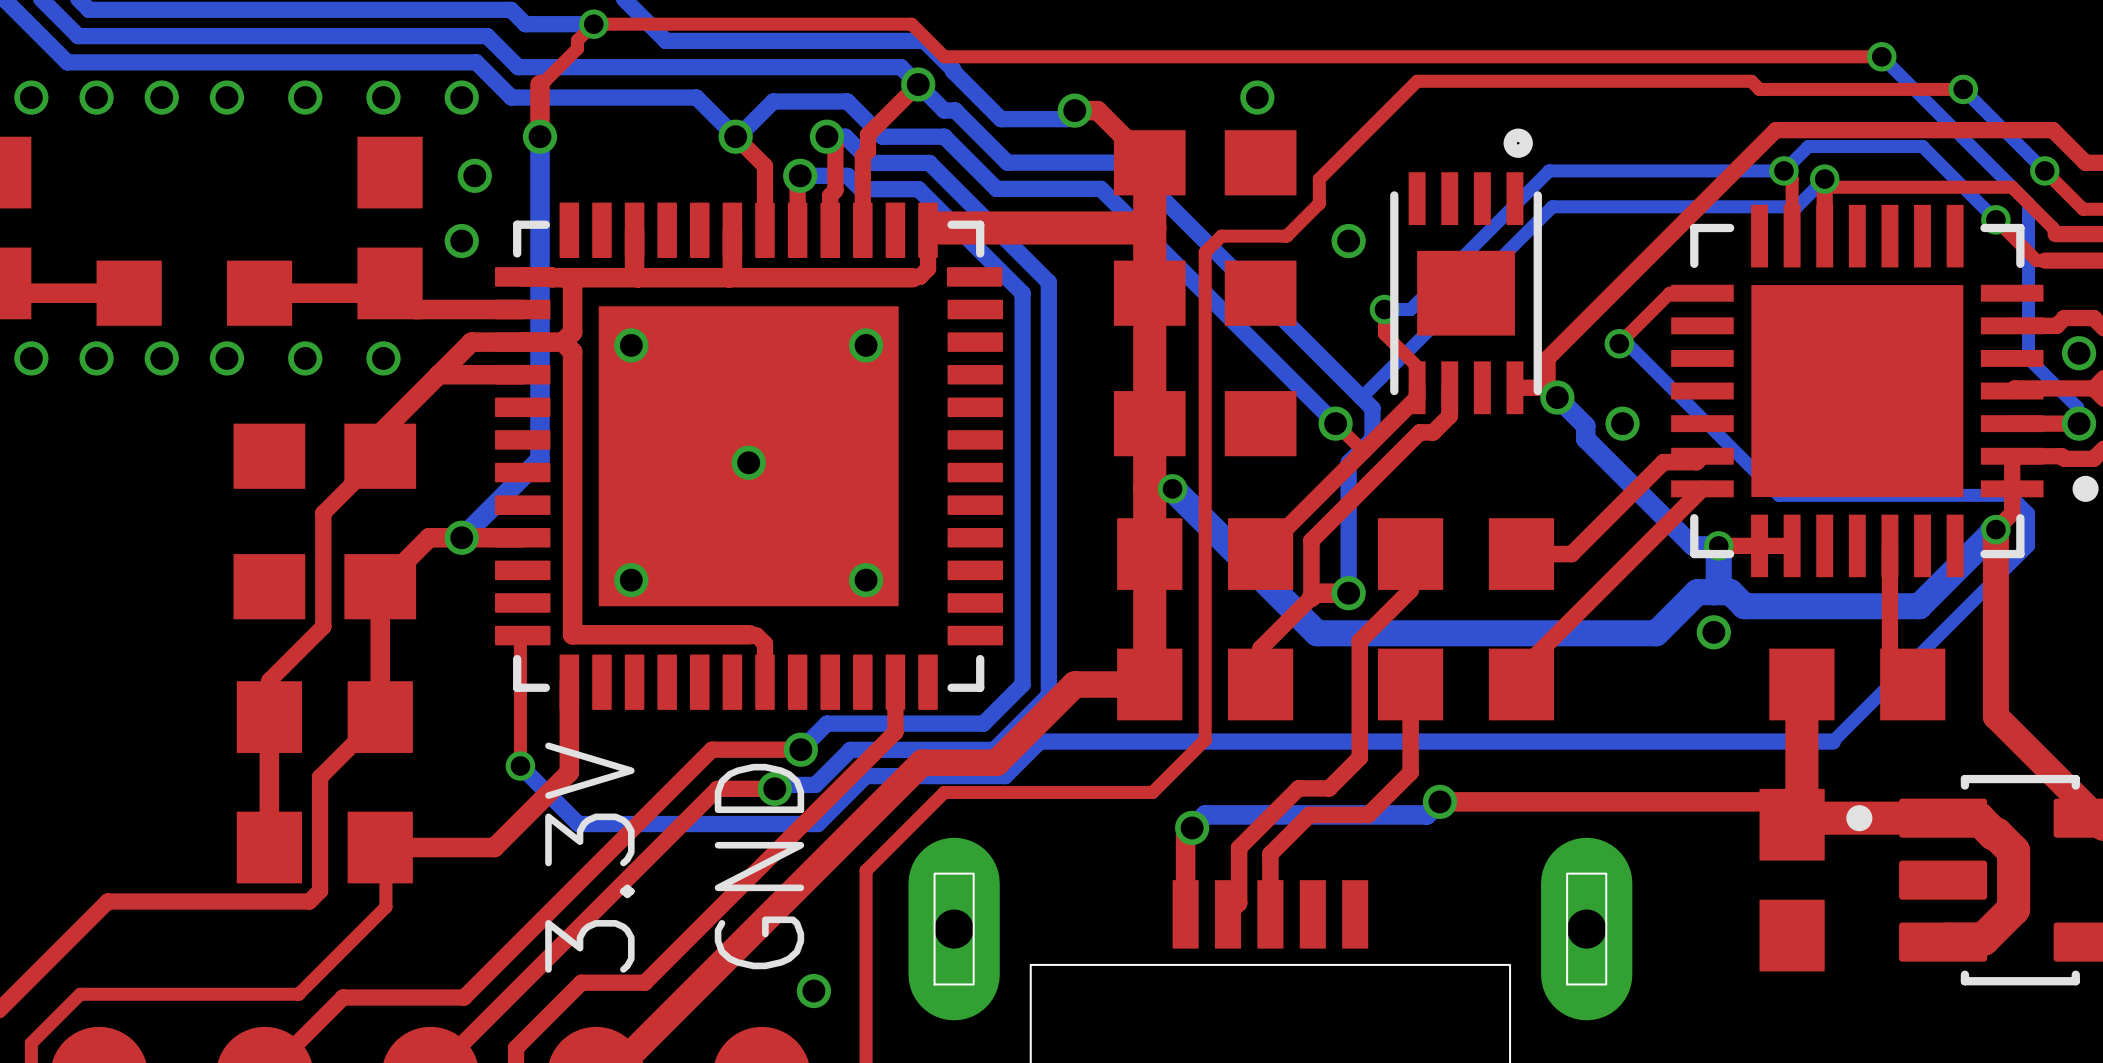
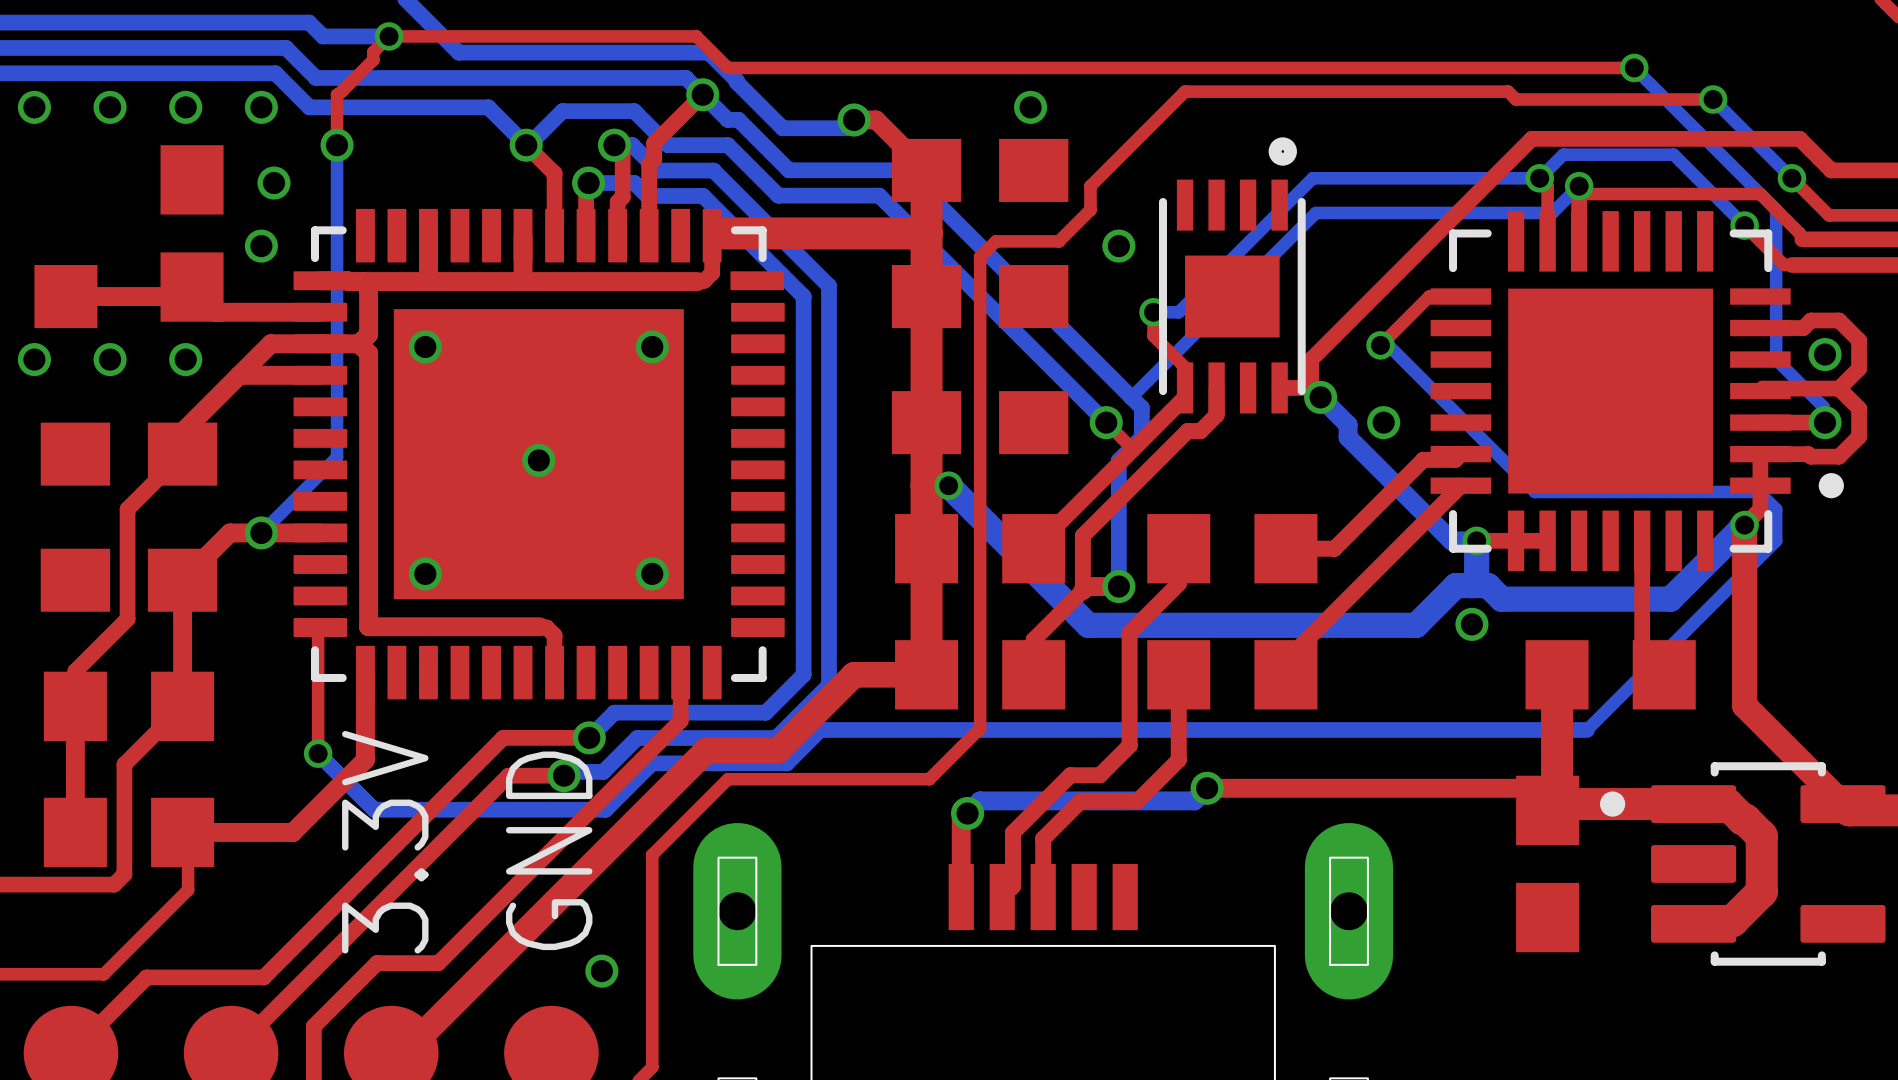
top track width: thick (540, 84) (540, 136) -> thin (337, 94) (337, 145)
bottom track width: thick (540, 136) (540, 459) (461, 537) -> thin (337, 145) (337, 457) (261, 532)

